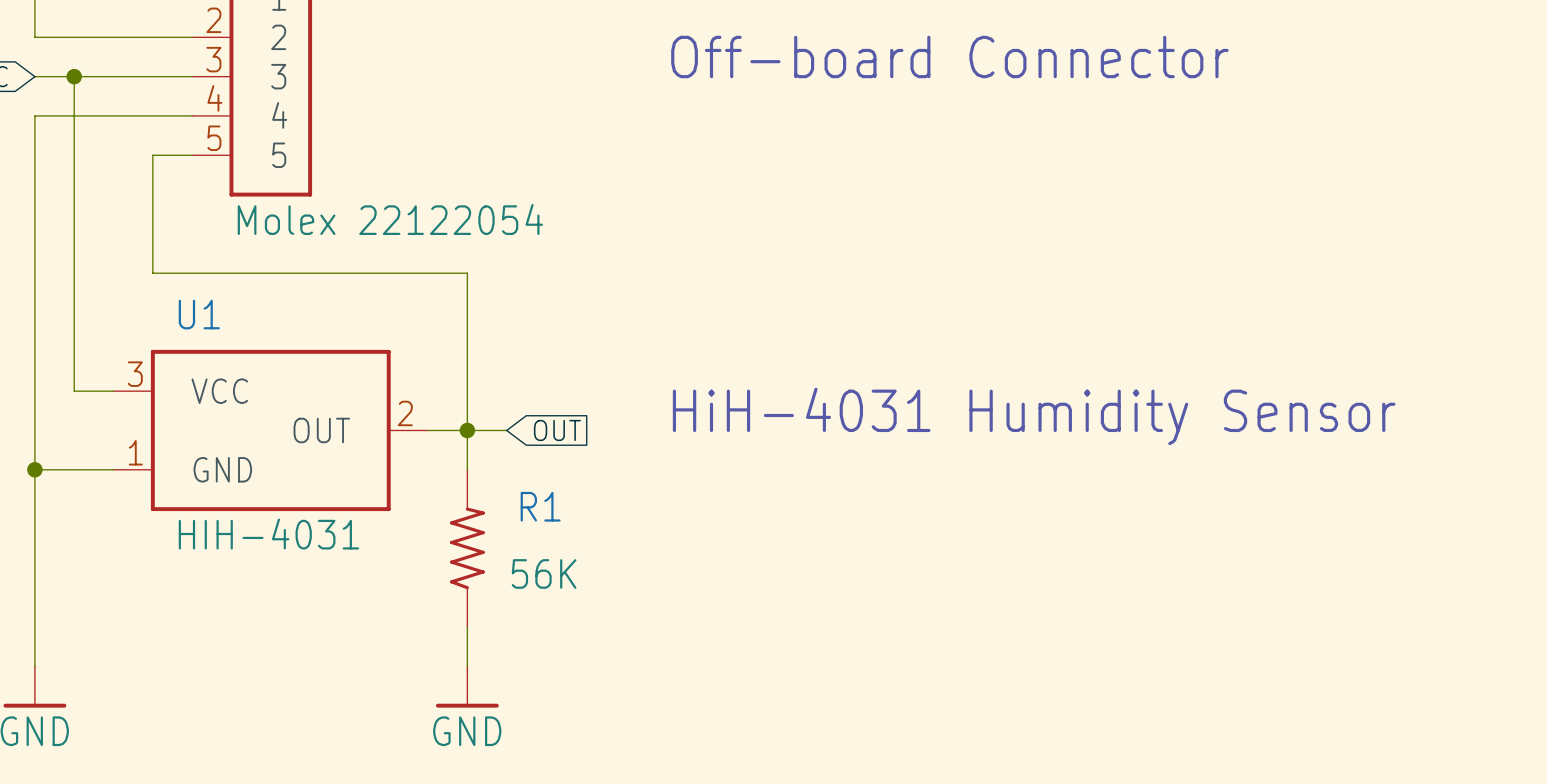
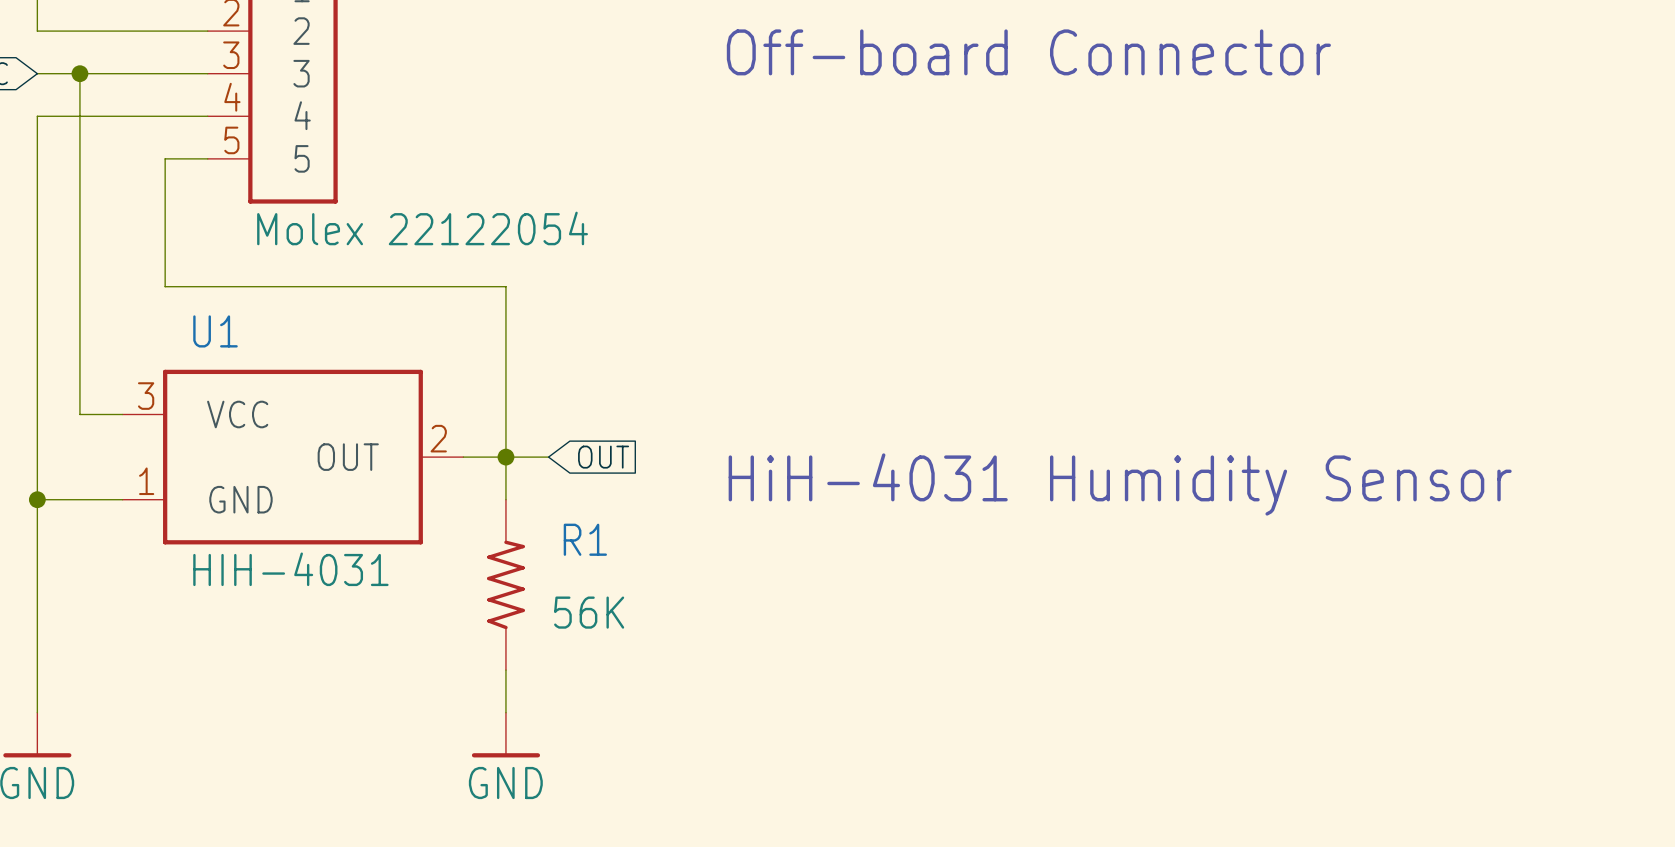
text position: HiH-4031 Humidity Sensor (1034, 416) -> HiH-4031 Humidity Sensor (1120, 484)

